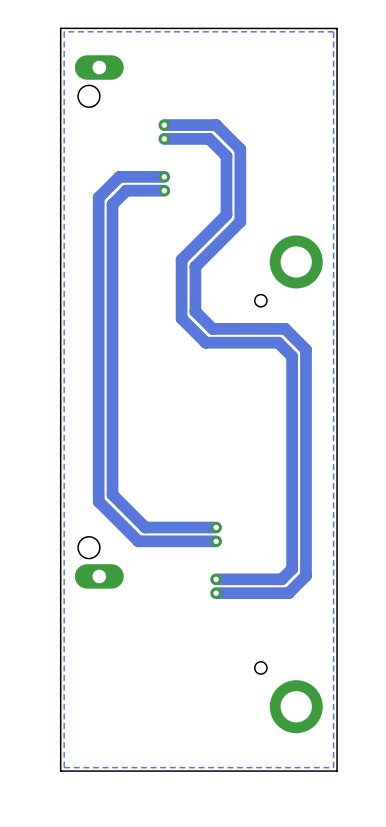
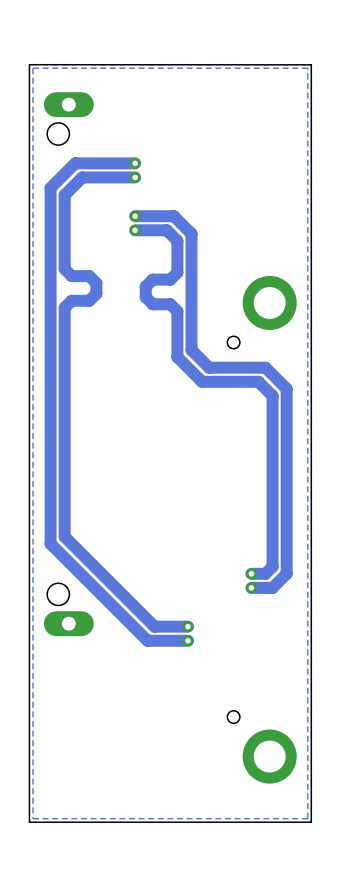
track: (164, 125) (216, 125) (240, 149) (240, 221) (195, 266) (195, 311) (212, 328) (285, 328) (305, 349) (305, 575) (288, 593) (216, 593) -> (135, 163) (75, 163) (50, 188) (50, 543) (147, 640) (187, 640)
track: (164, 138) (209, 138) (226, 156) (226, 214) (181, 259) (181, 318) (205, 342) (278, 342) (292, 356) (292, 568) (281, 579) (216, 579) -> (135, 177) (82, 177) (64, 195) (64, 269) (71, 276) (89, 276) (96, 283) (96, 293) (89, 300) (71, 300) (64, 307) (64, 536) (154, 626) (187, 626)
track: (164, 176) (119, 176) (98, 197) (98, 501) (138, 541) (216, 541) -> (135, 216) (173, 216) (191, 233) (191, 350) (209, 367) (265, 367) (286, 388) (286, 573) (272, 587) (251, 587)
track: (164, 190) (126, 190) (112, 204) (112, 494) (145, 527) (216, 527) -> (135, 230) (166, 230) (177, 240) (177, 272) (170, 279) (152, 279) (145, 286) (145, 297) (152, 304) (170, 304) (177, 311) (177, 357) (202, 381) (258, 381) (272, 395) (272, 566) (265, 573) (251, 573)
via: (216, 527) -> none
via: none -> (251, 573)
via: (216, 541) -> none
via: none -> (251, 587)

